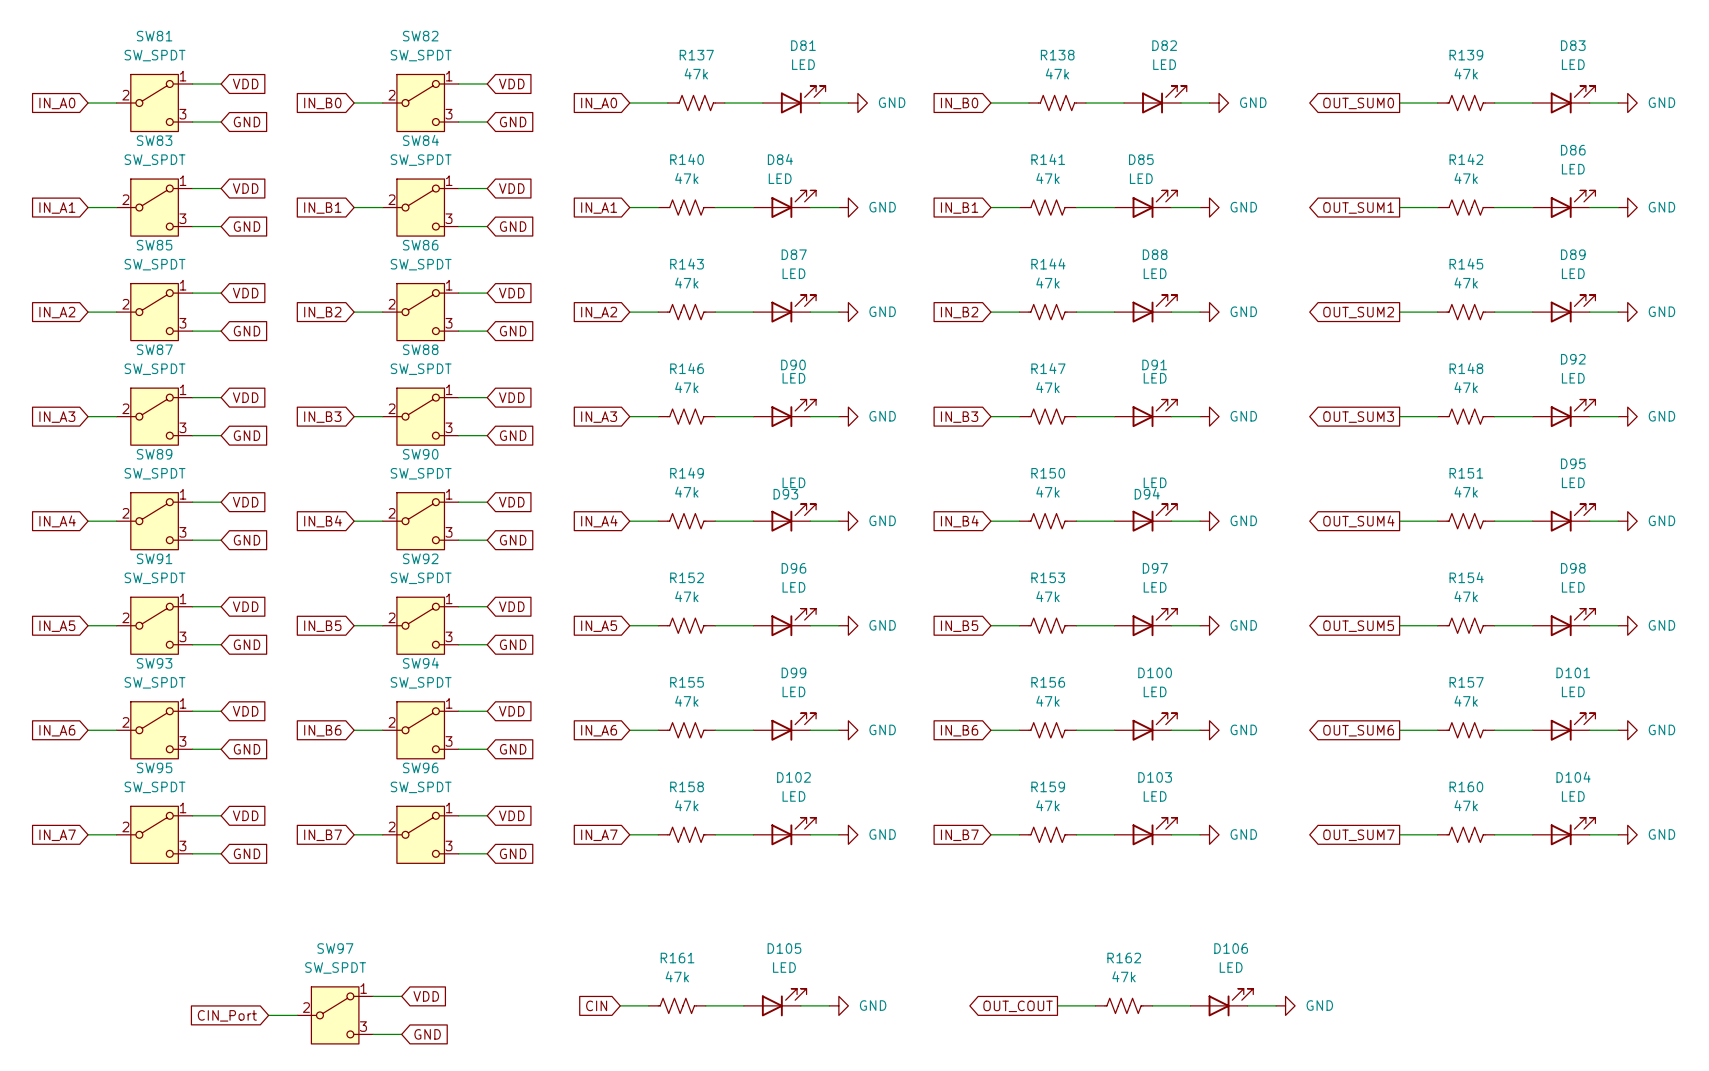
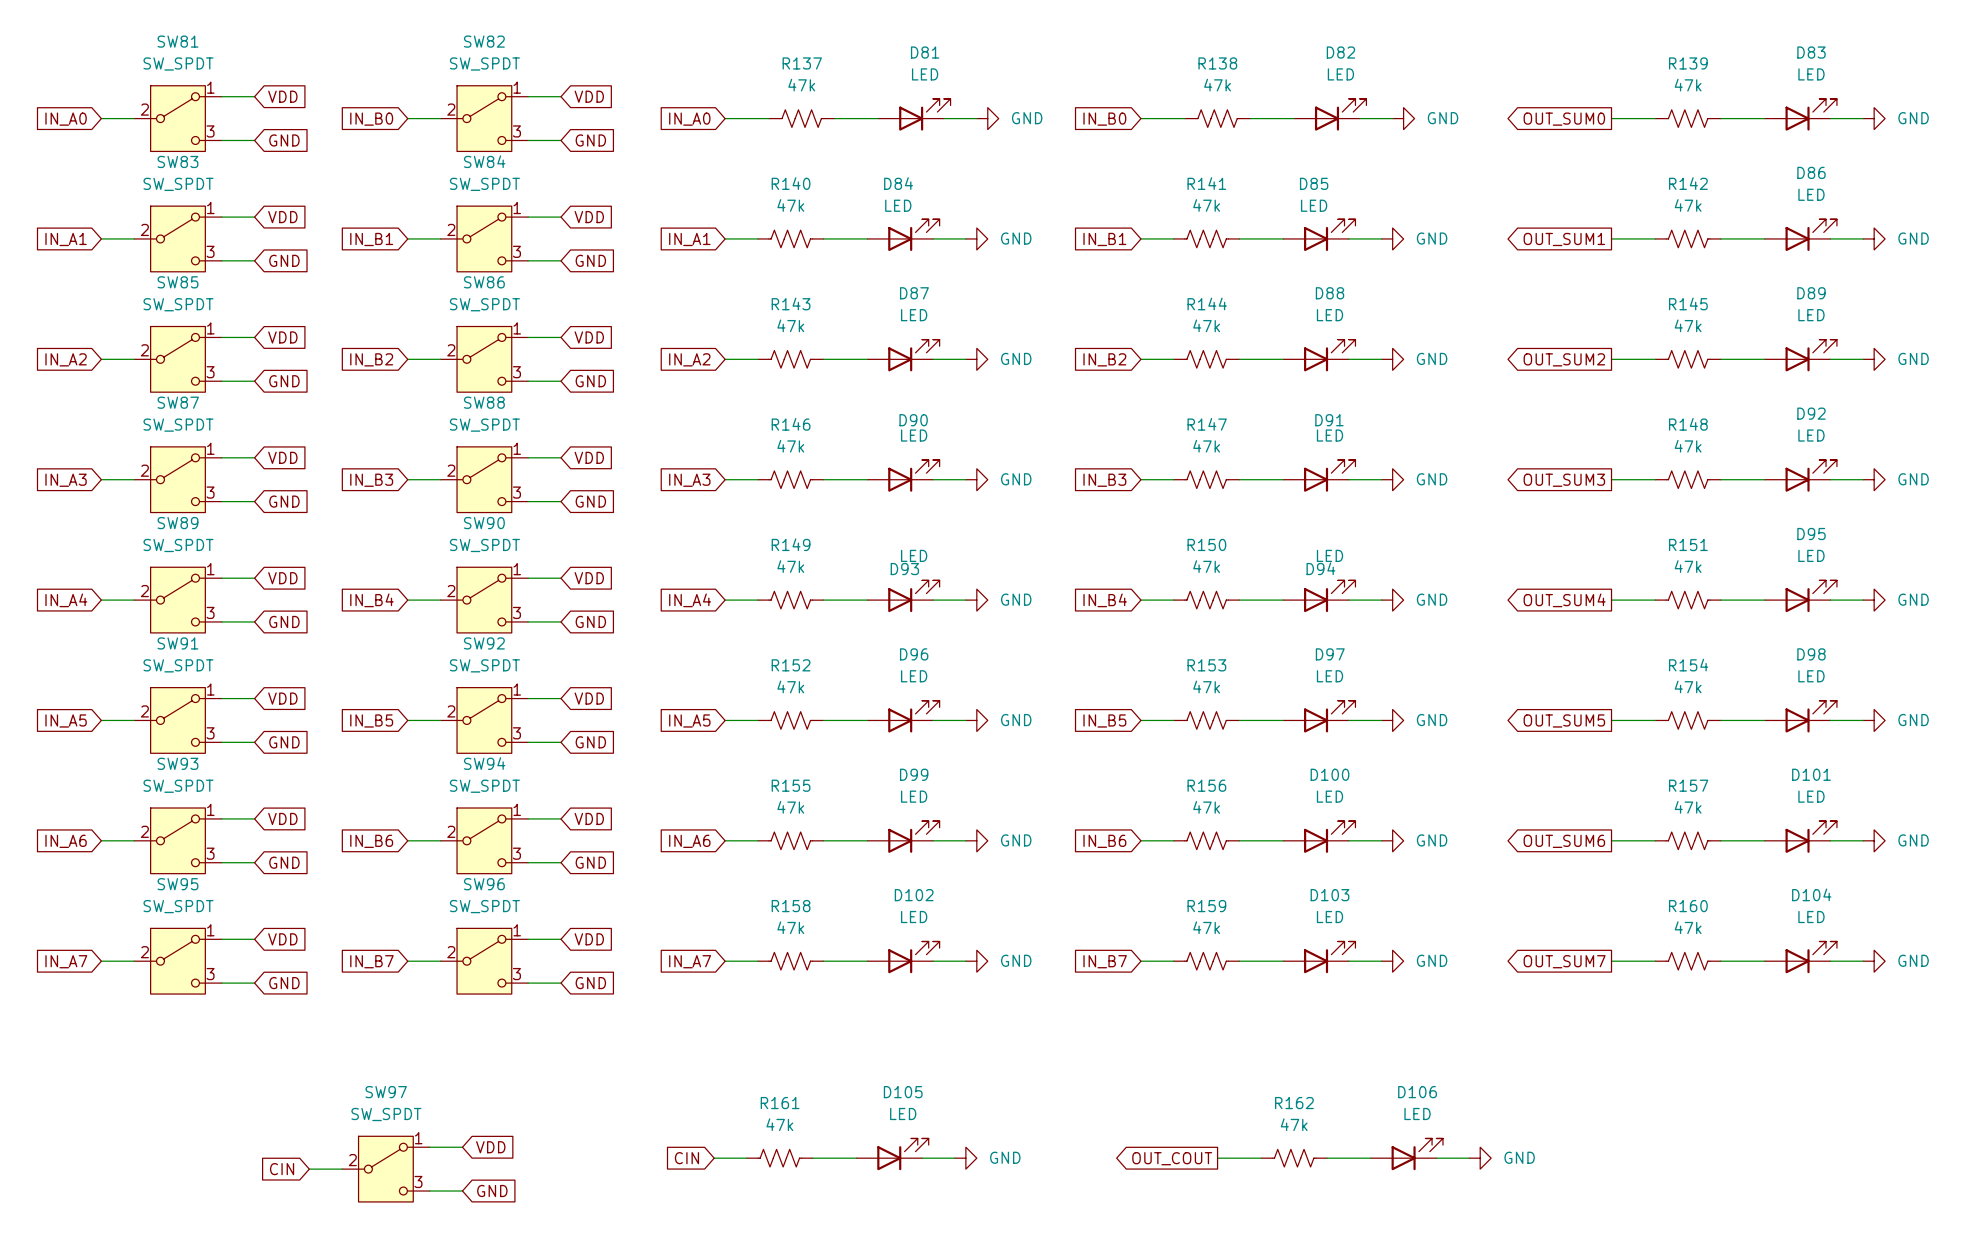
global label: CIN_Port (227, 1015) -> CIN (282, 1169)

